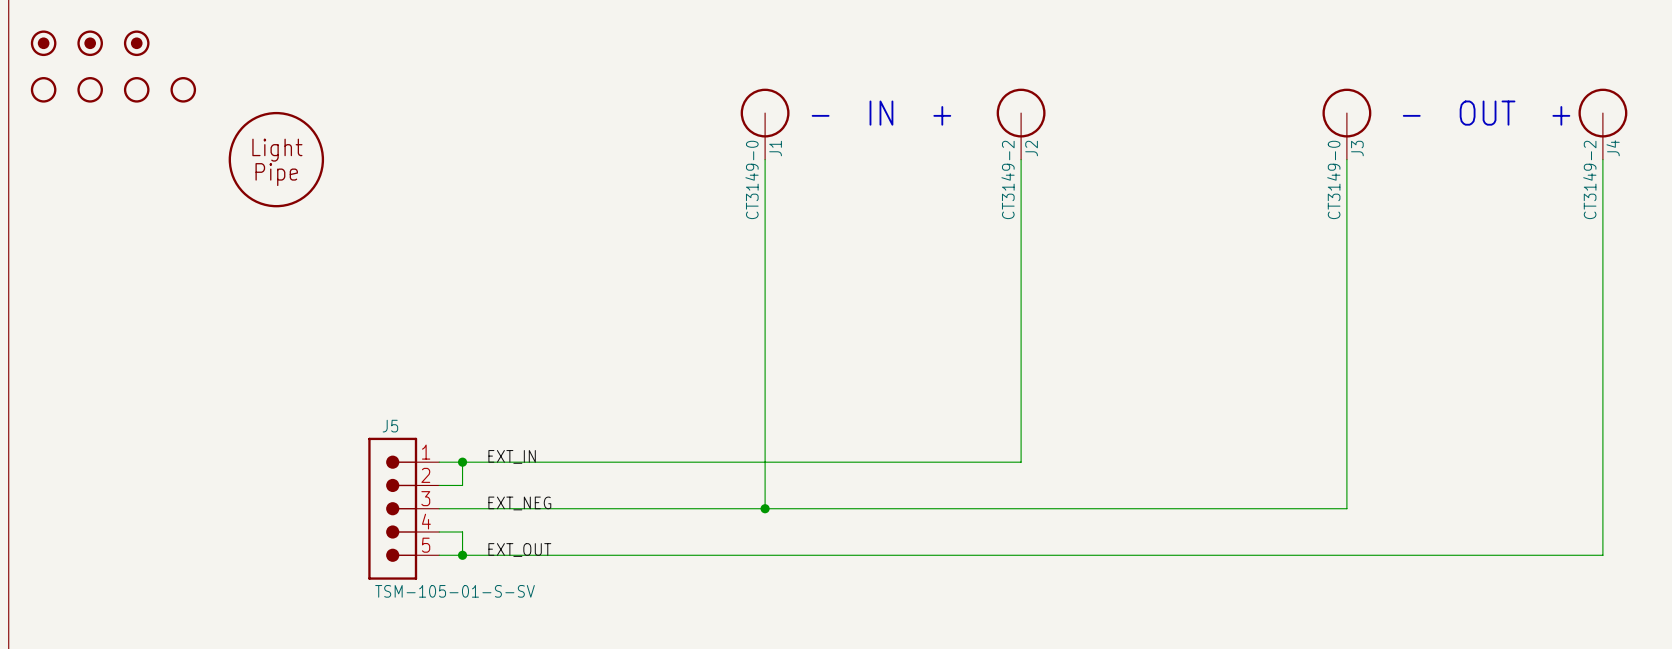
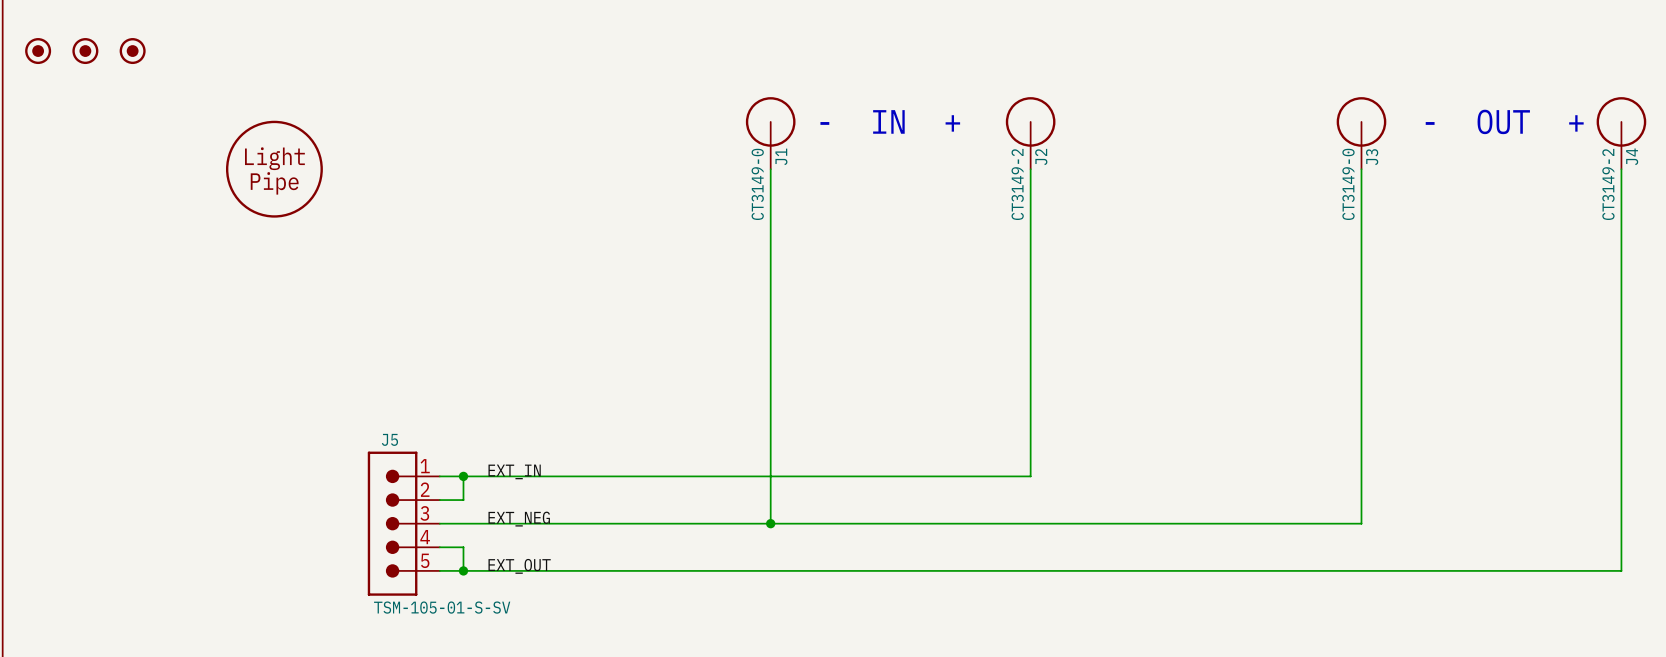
part: (43, 89) -> none
part: (90, 89) -> none
part: (136, 89) -> none
part: (183, 89) -> none

